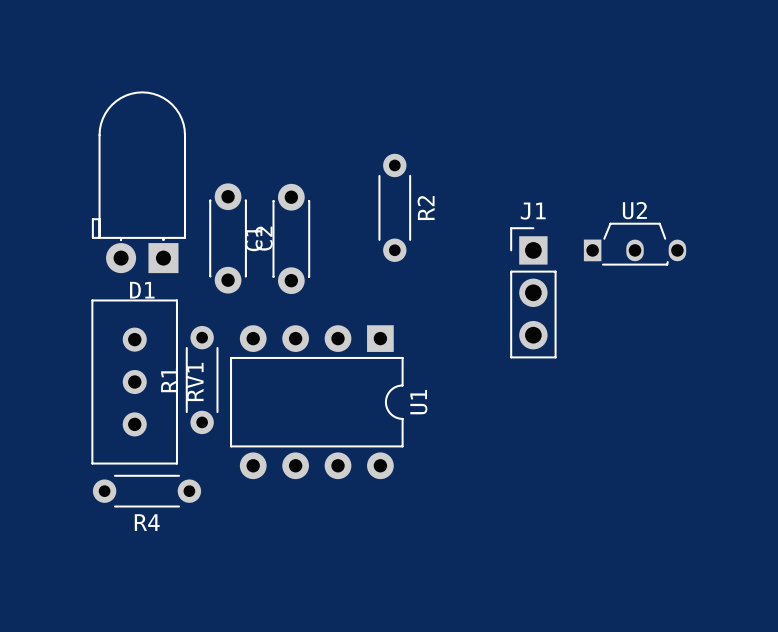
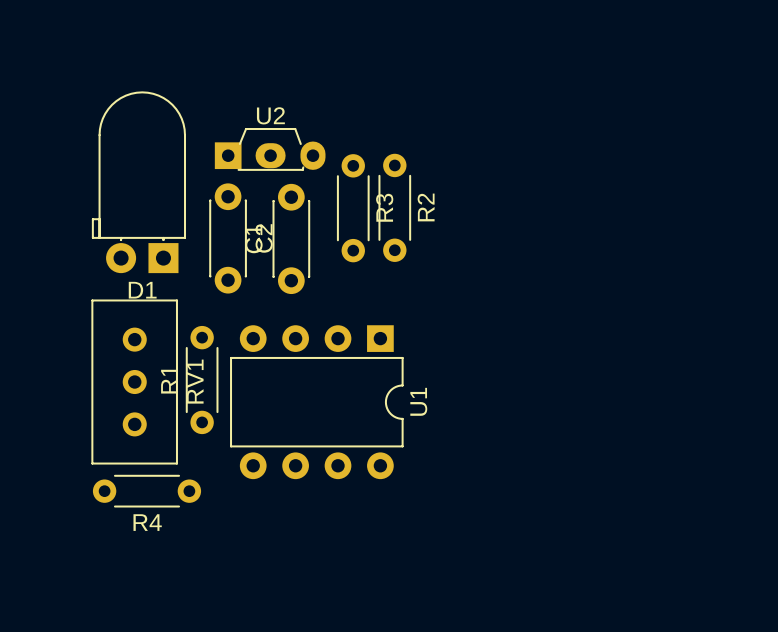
R3: none -> (353, 208)
U2 footprint: [583, 222, 687, 266] -> [214, 127, 326, 171]
J1: (533, 292) -> none

